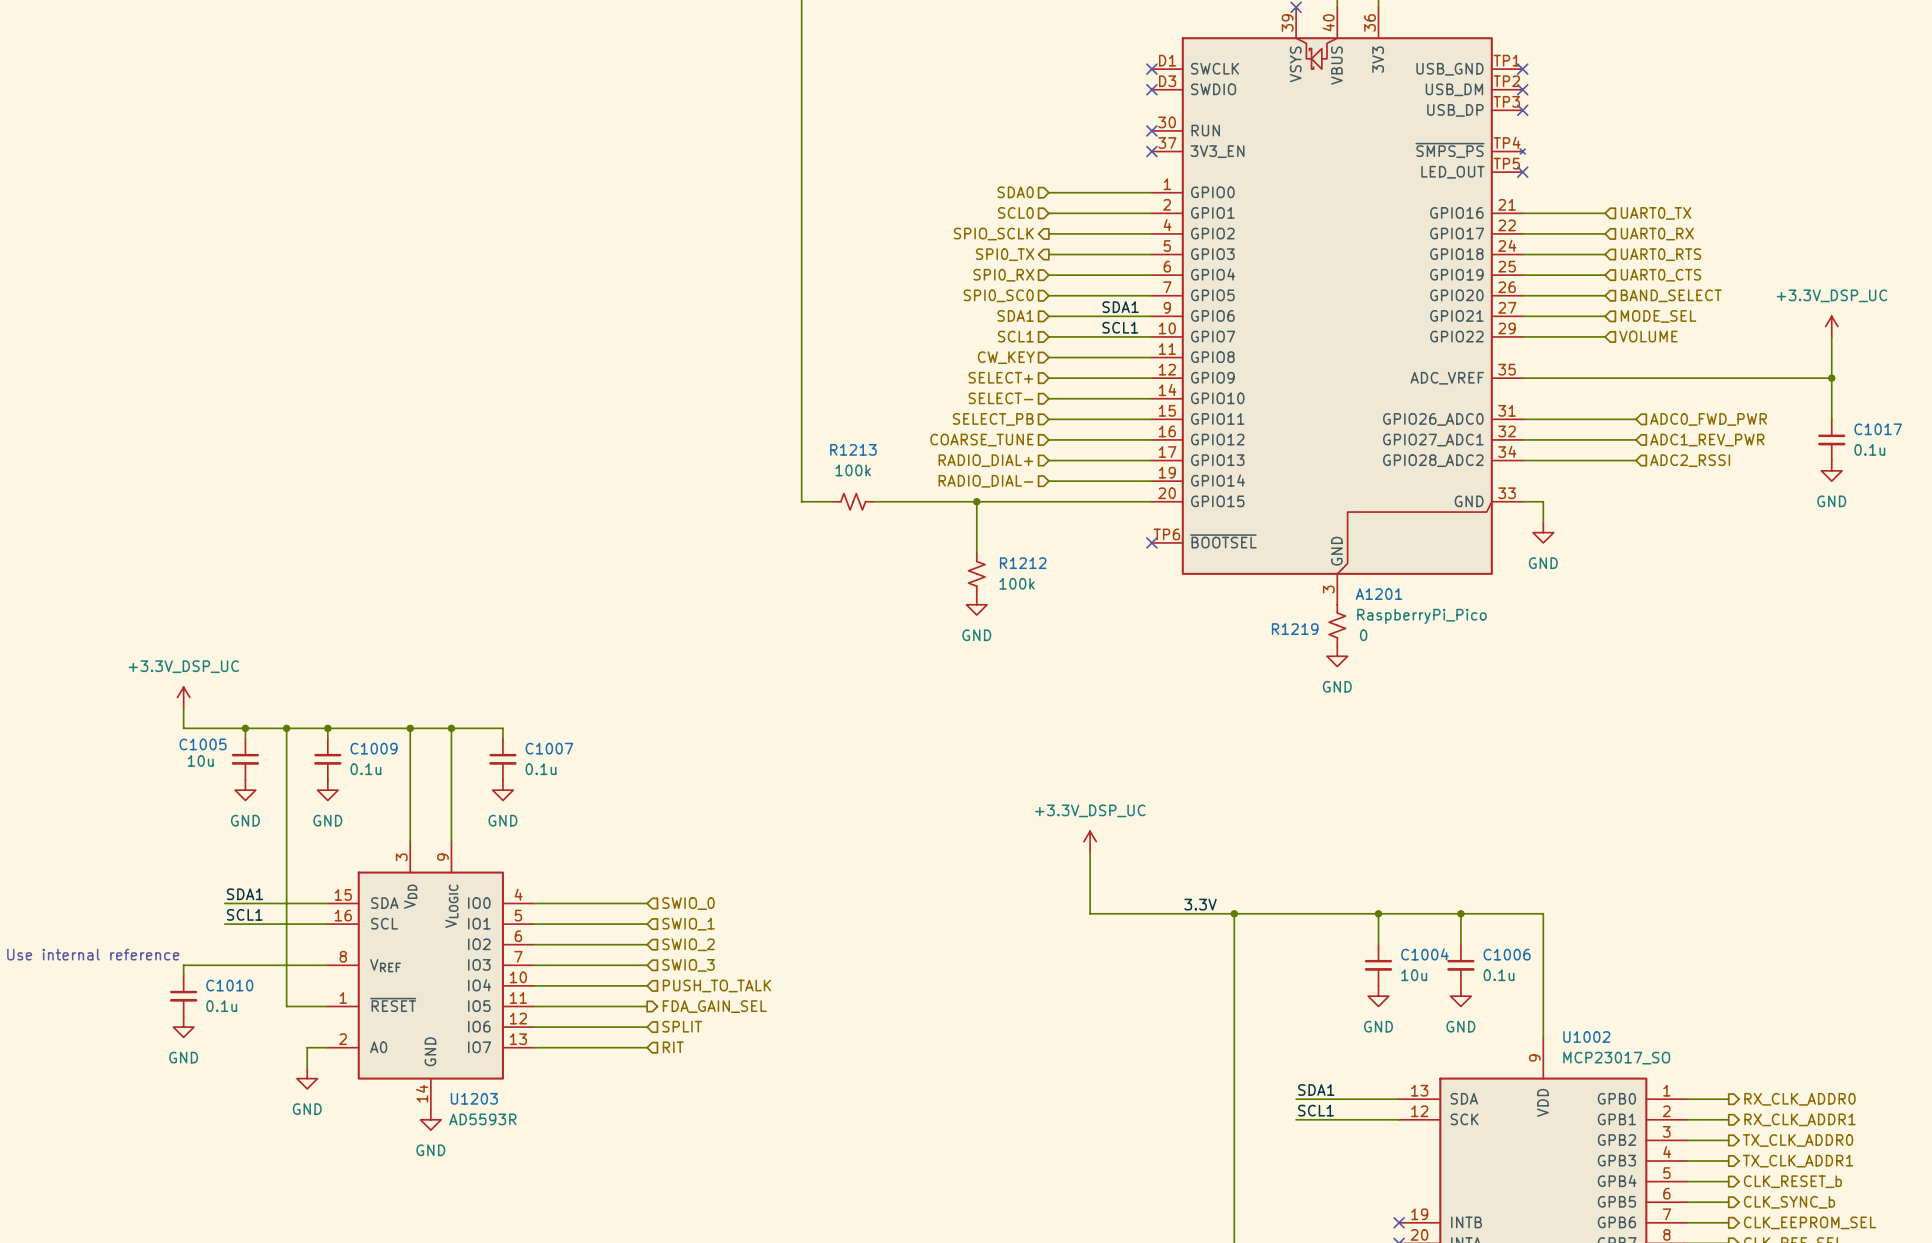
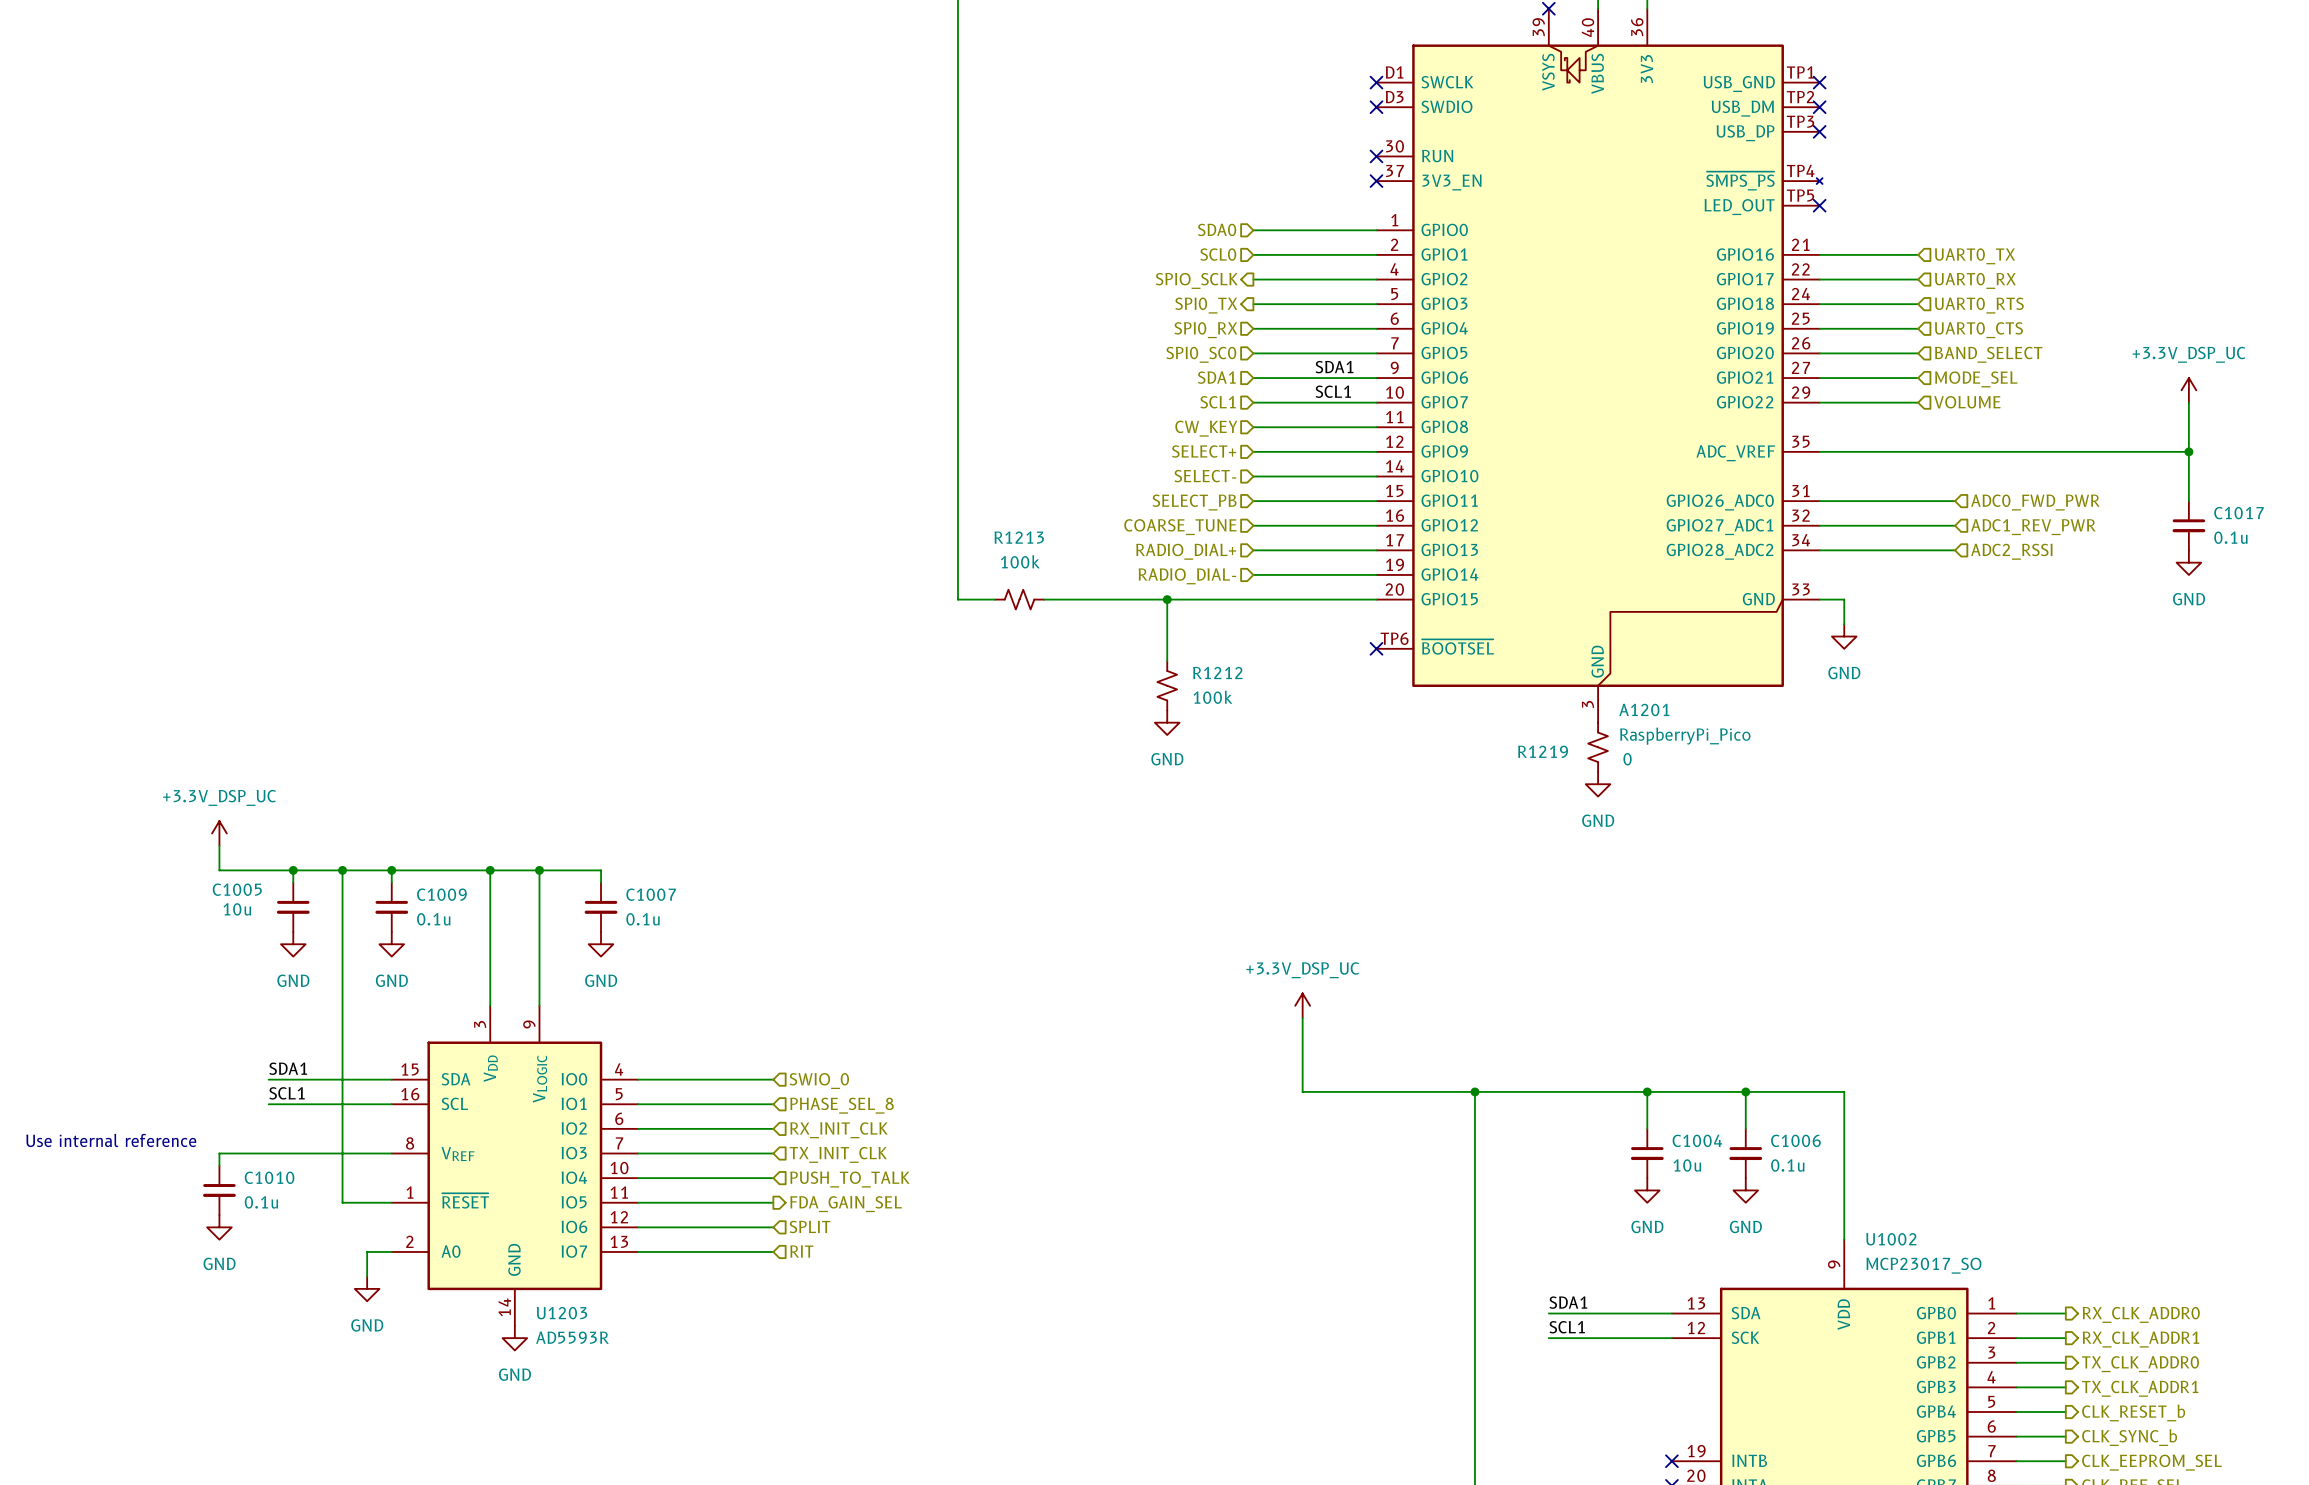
label: 3.3V (1200, 904) -> none
hierarchical label: SWIO_1 (688, 924) -> PHASE_SEL_8 (841, 1105)
hierarchical label: SWIO_2 (688, 944) -> RX_INIT_CLK (838, 1130)
hierarchical label: SWIO_3 (688, 965) -> TX_INIT_CLK (838, 1154)

